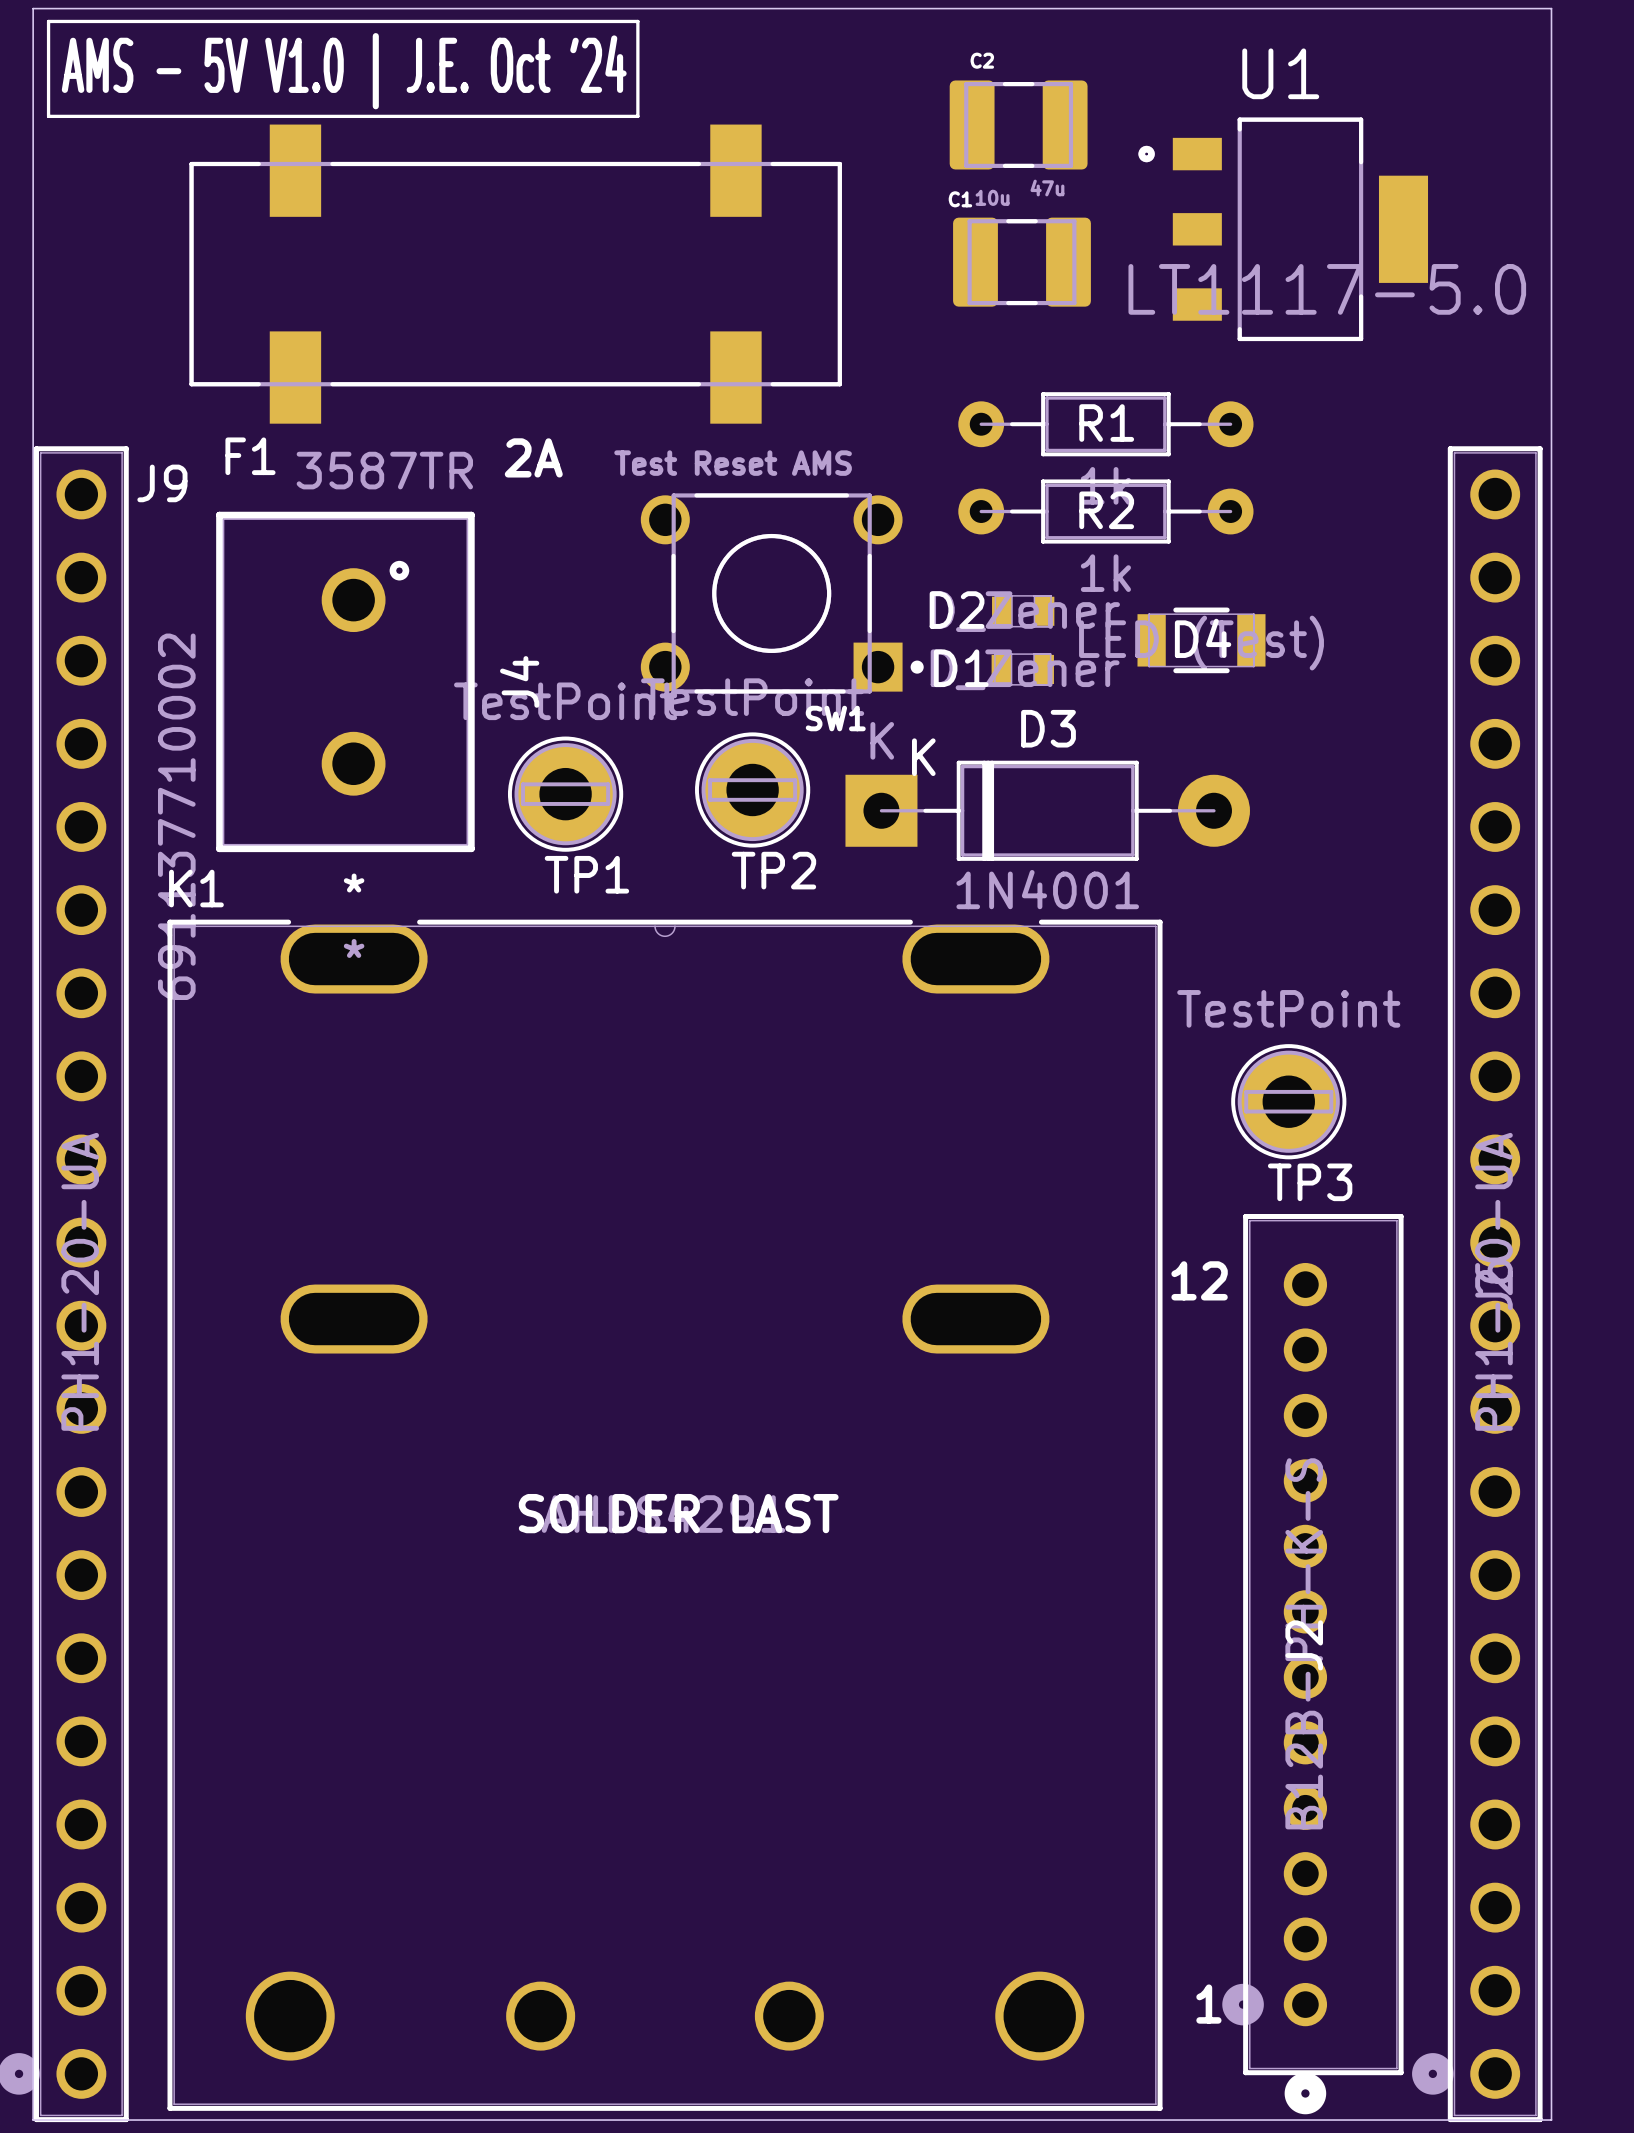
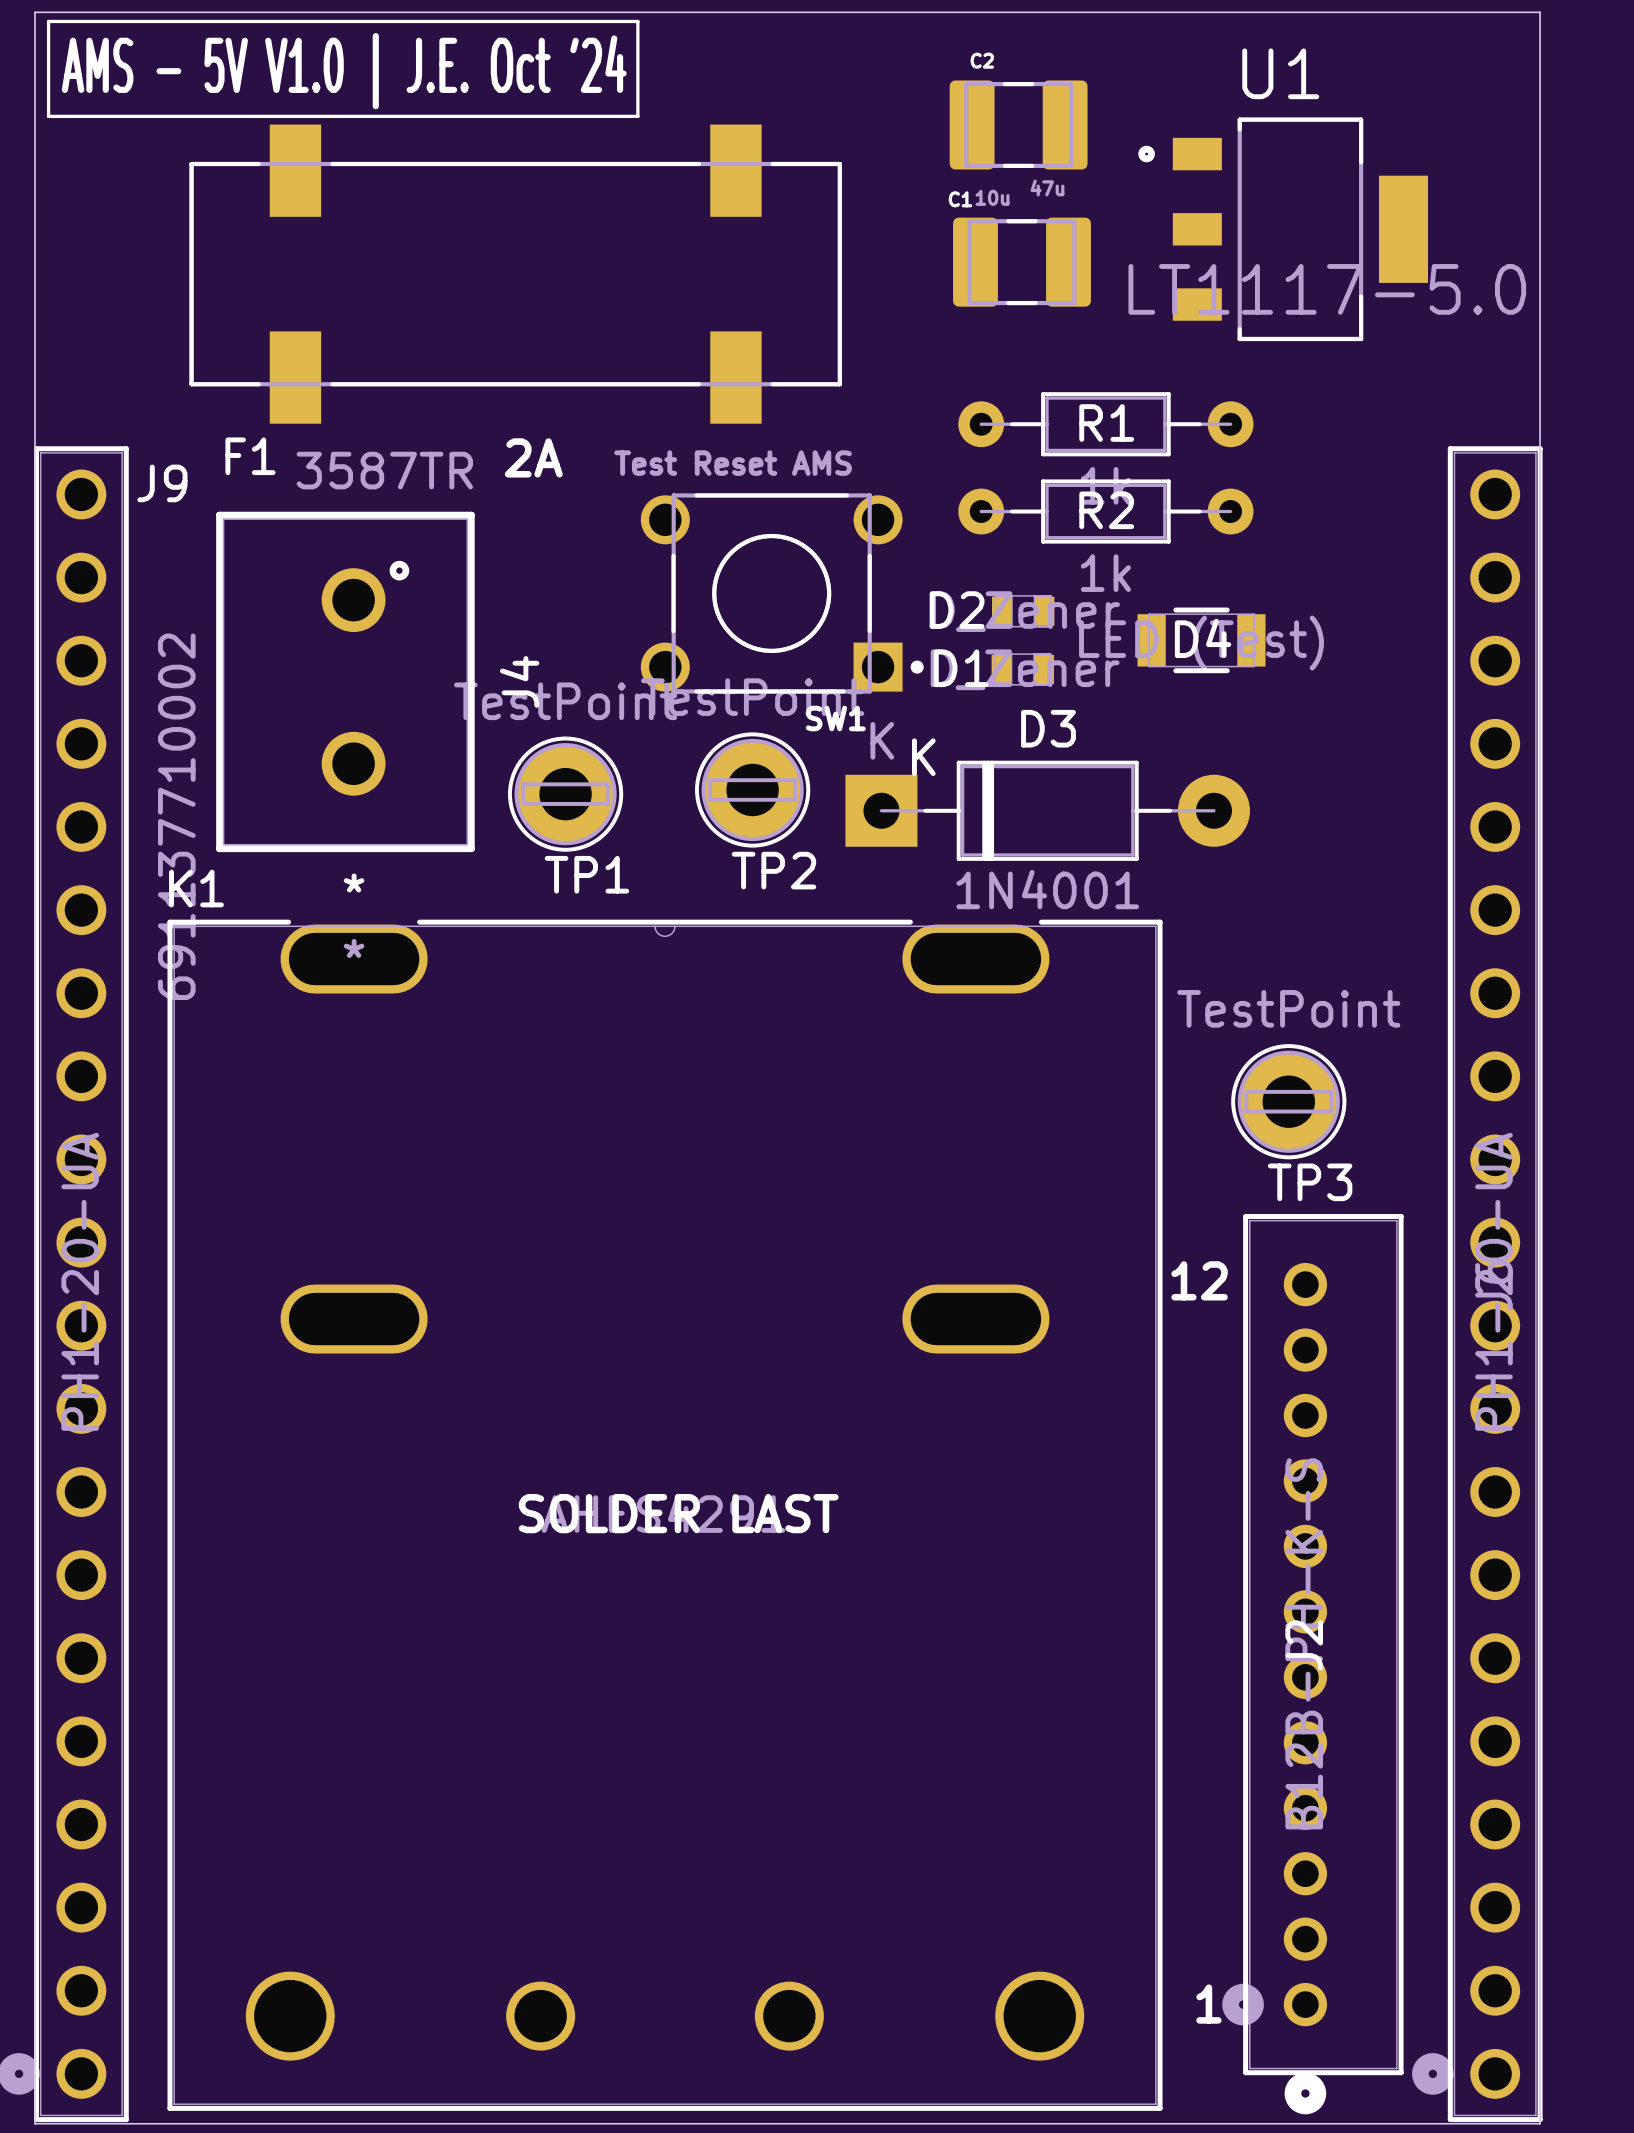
board edge: (33, 8) (1551, 8) (1551, 2120) (33, 2120) (33, 8) -> (35, 12) (35, 2123) (1540, 2123) (1540, 12) (35, 12)

